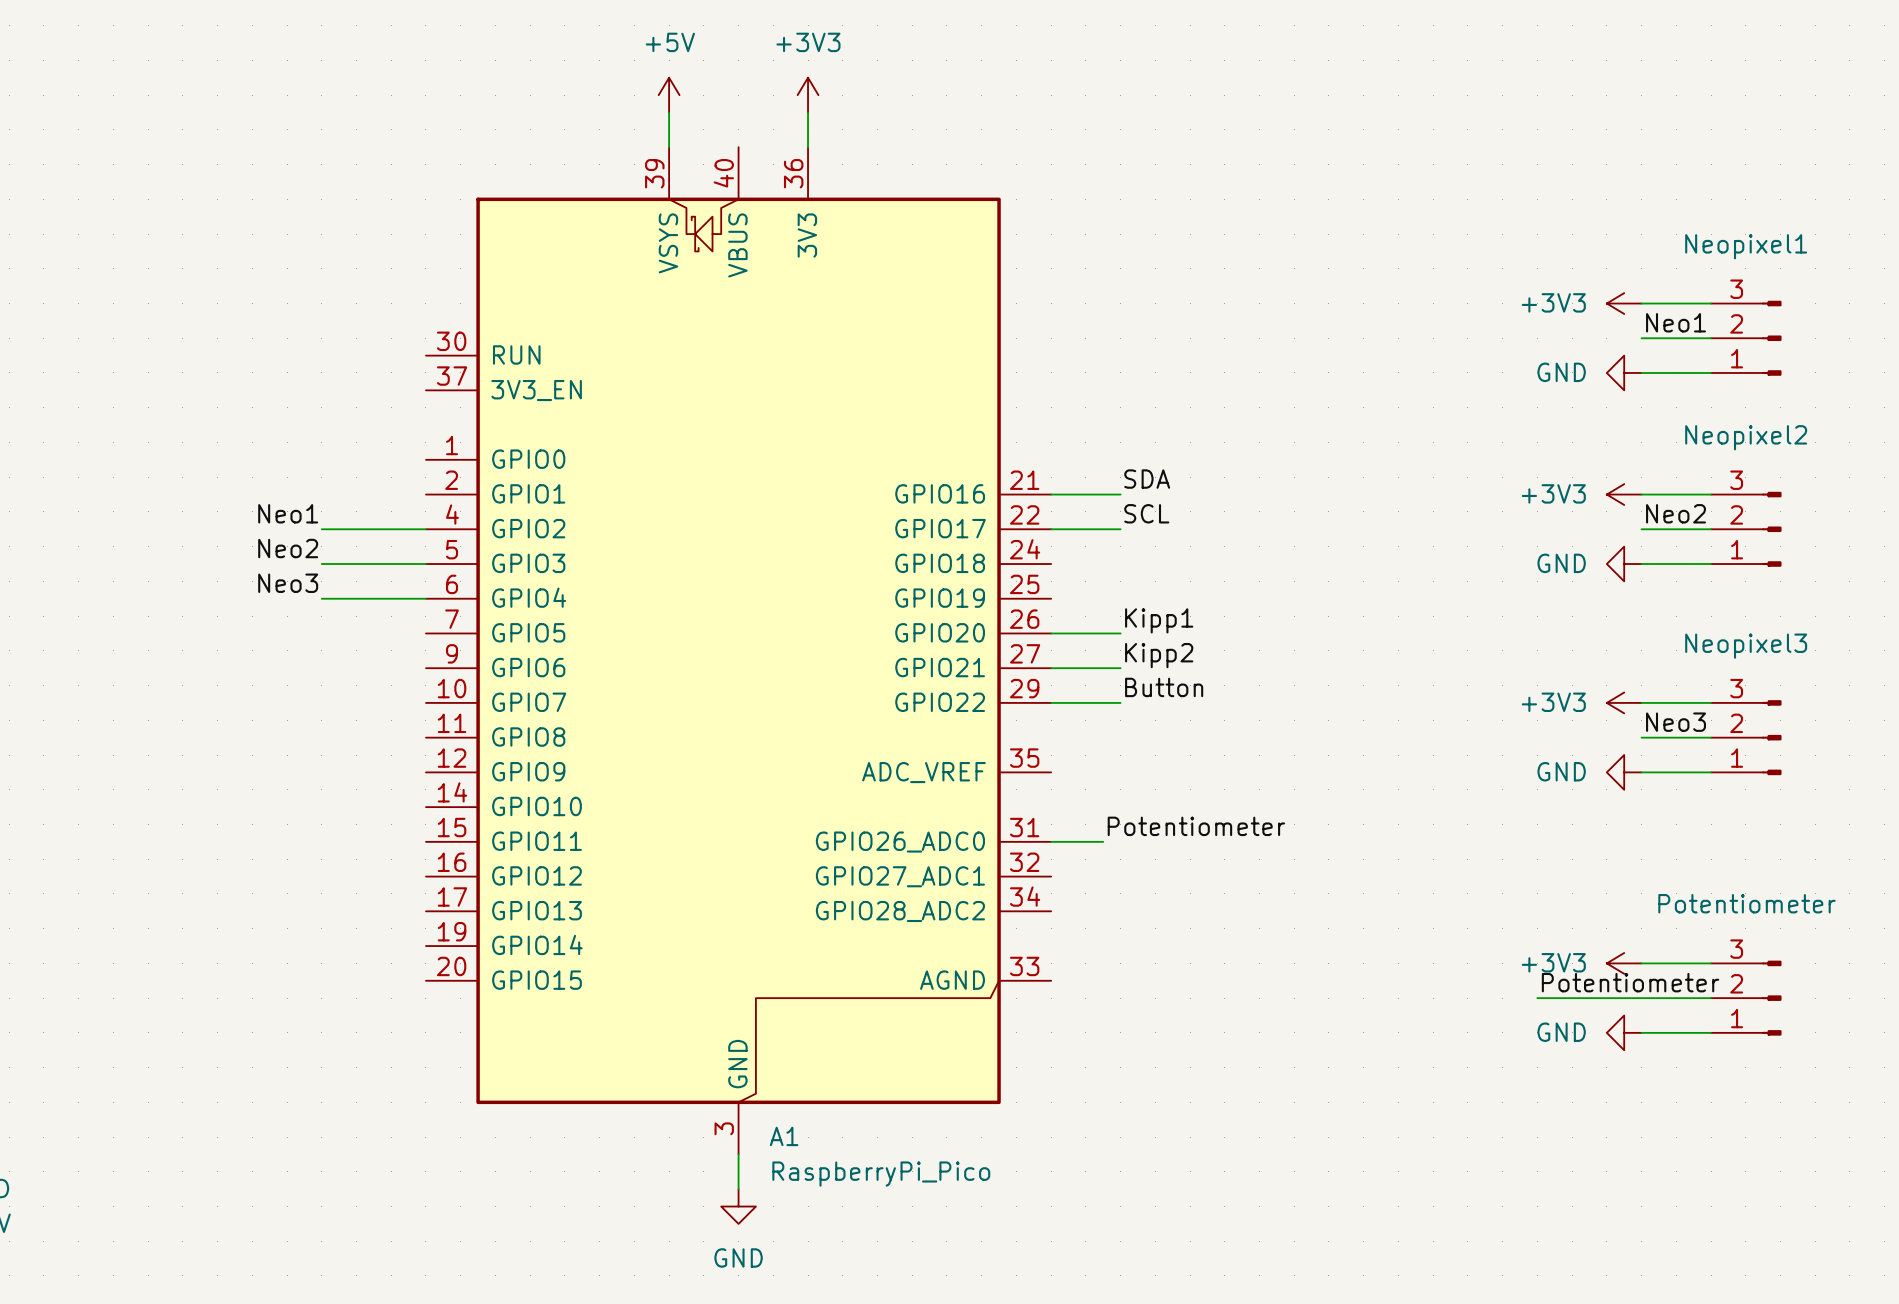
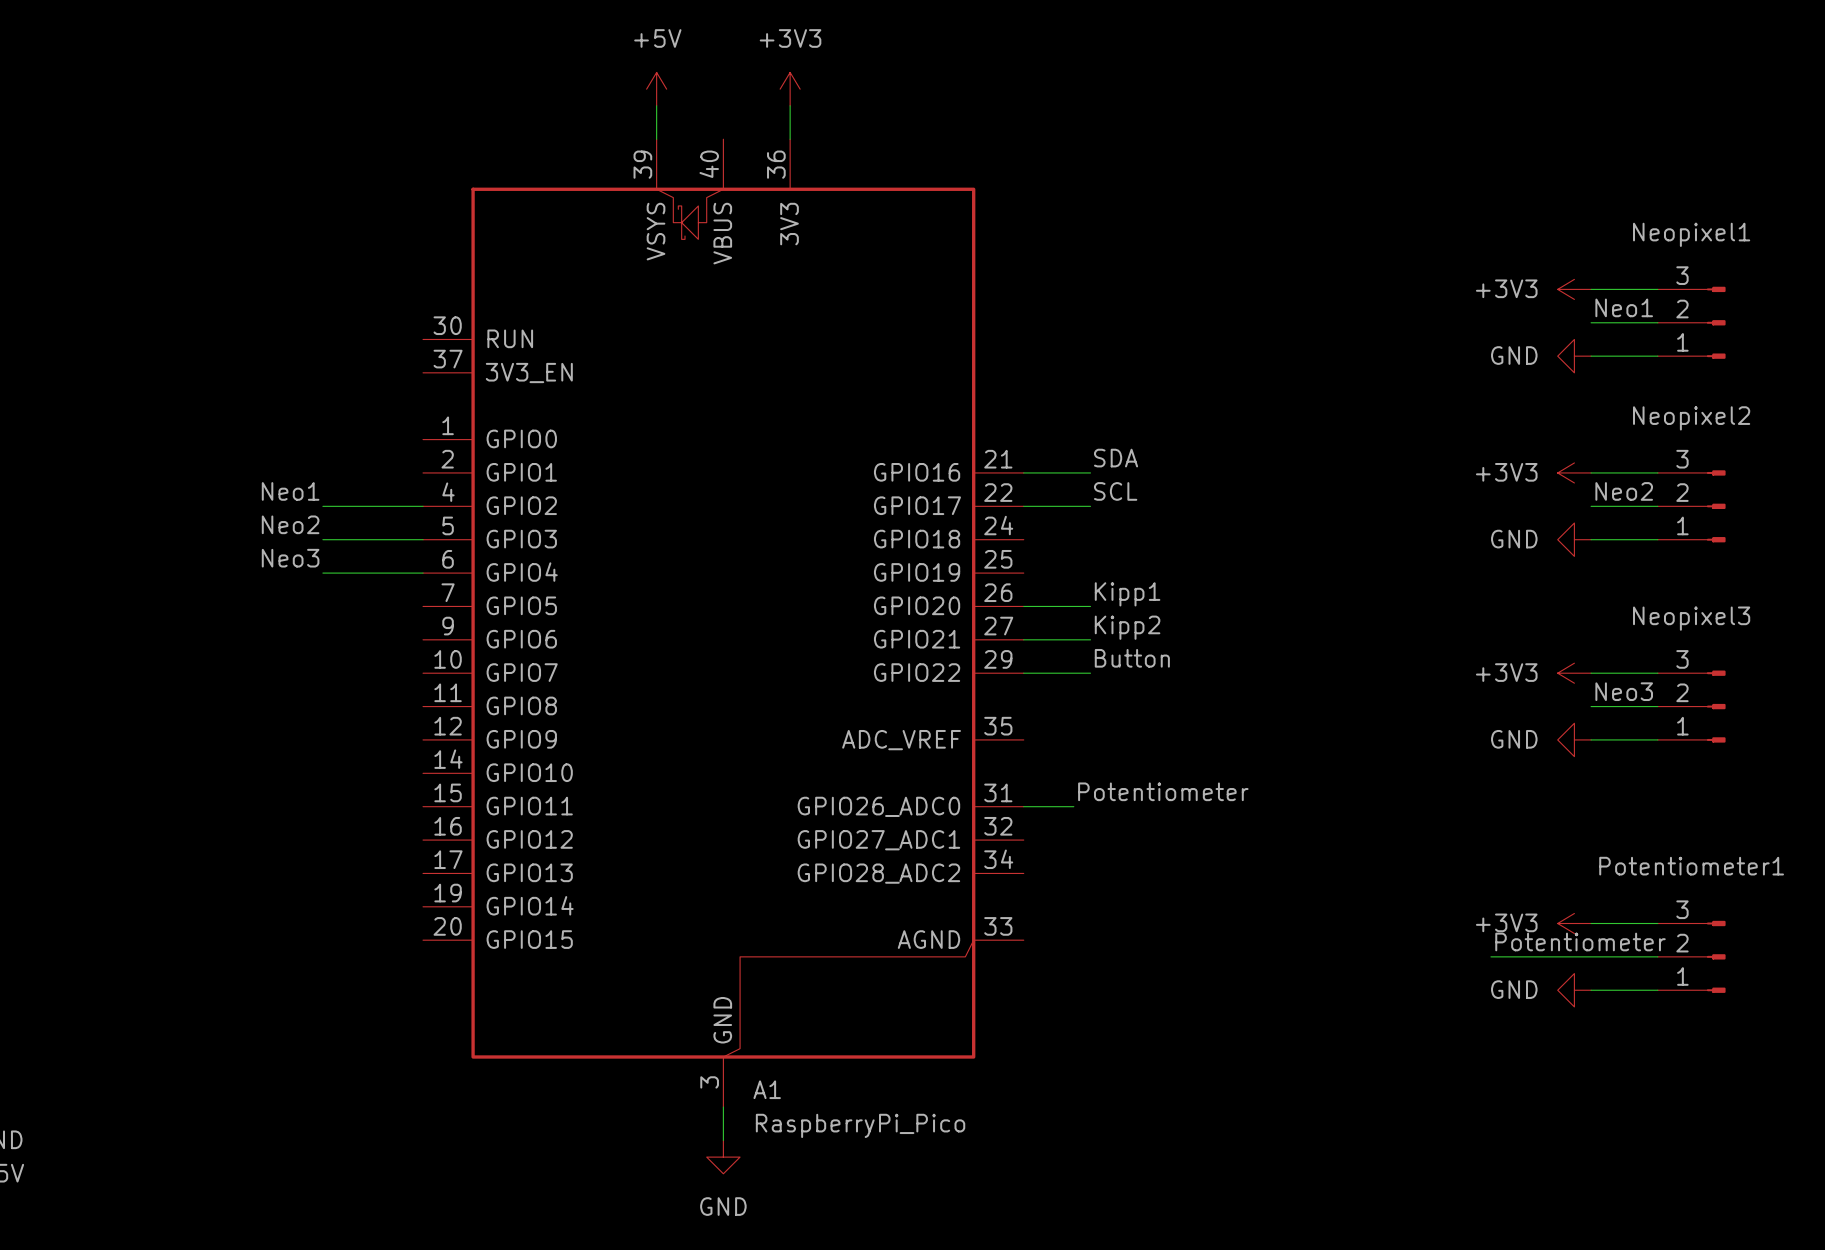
Potentiometer name: Potentiometer (1746, 903) -> Potentiometer1 (1691, 866)

